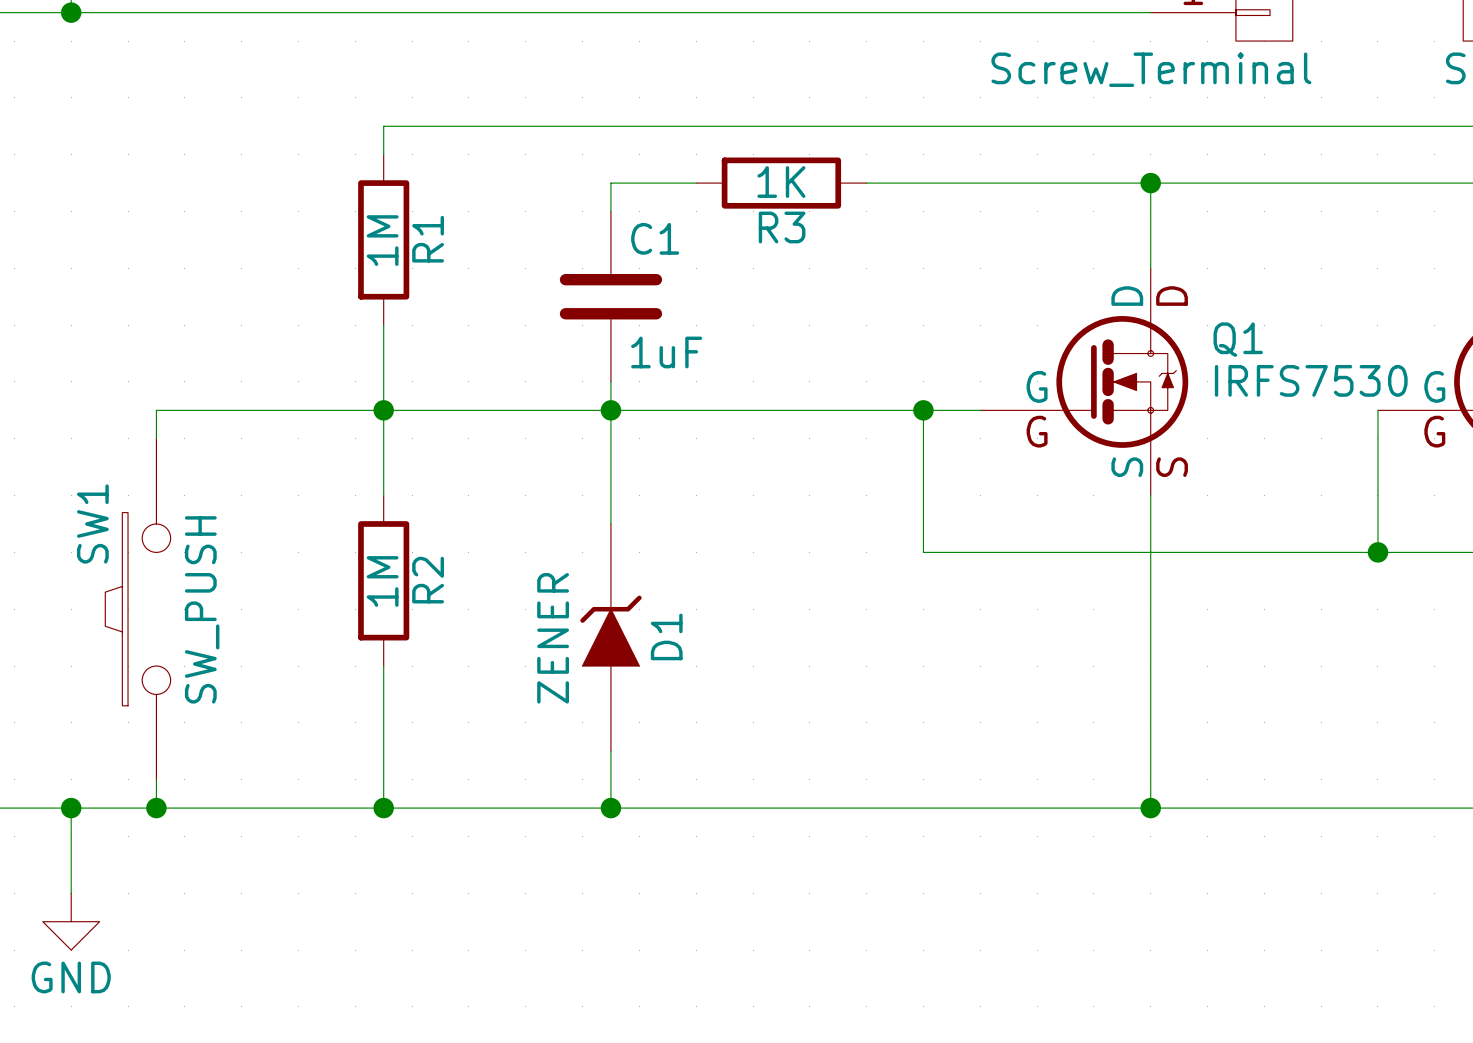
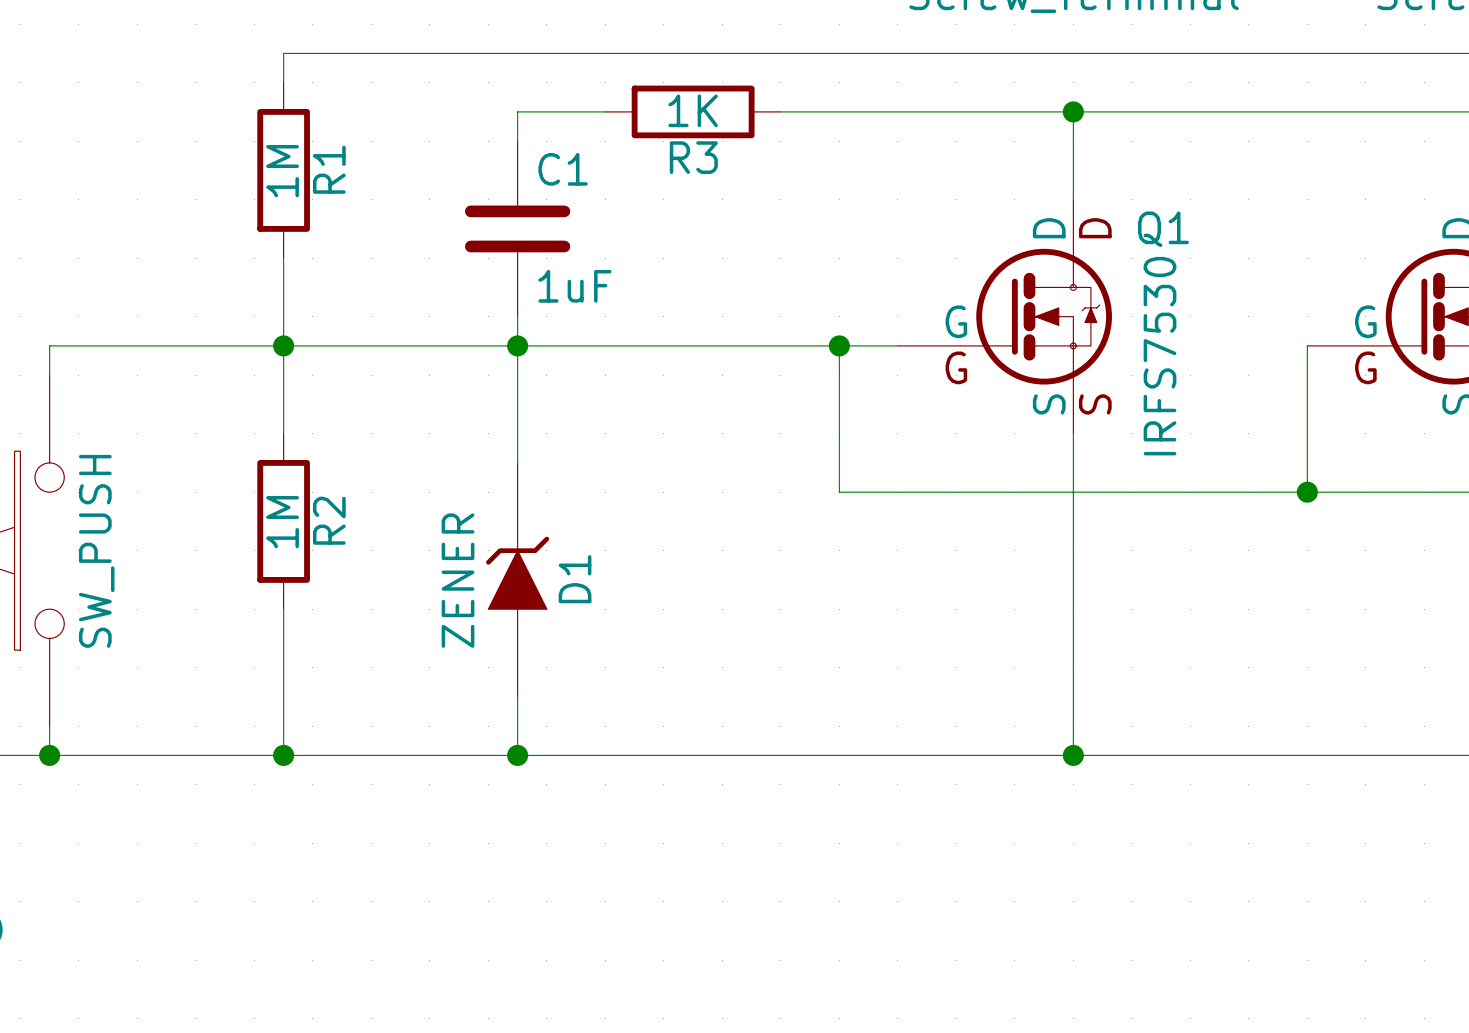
Q1 name position: Q1 (1238, 339) -> Q1 (1163, 229)
Q1 value rotation: 0° (1311, 380) -> 90° counterclockwise (1160, 356)

